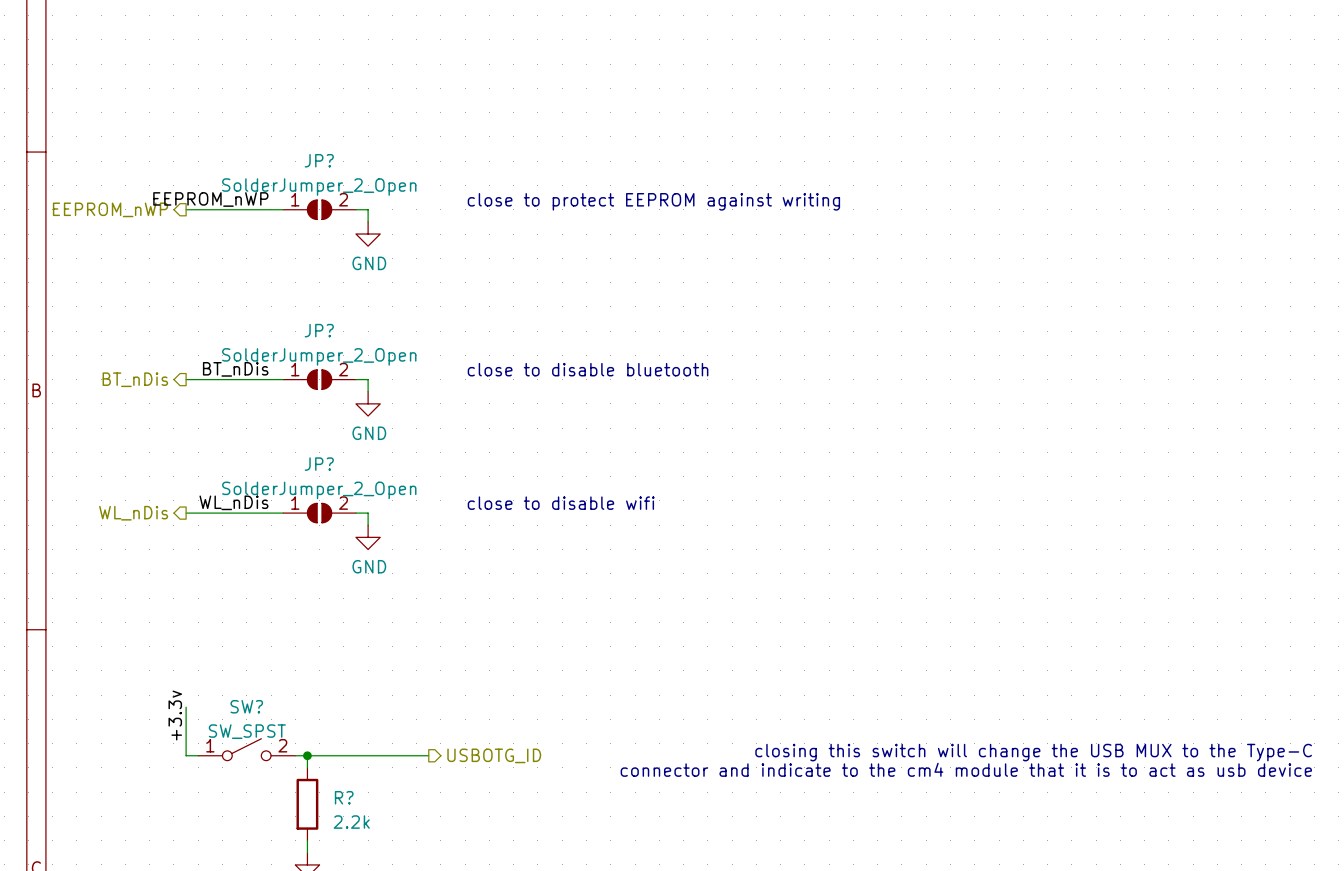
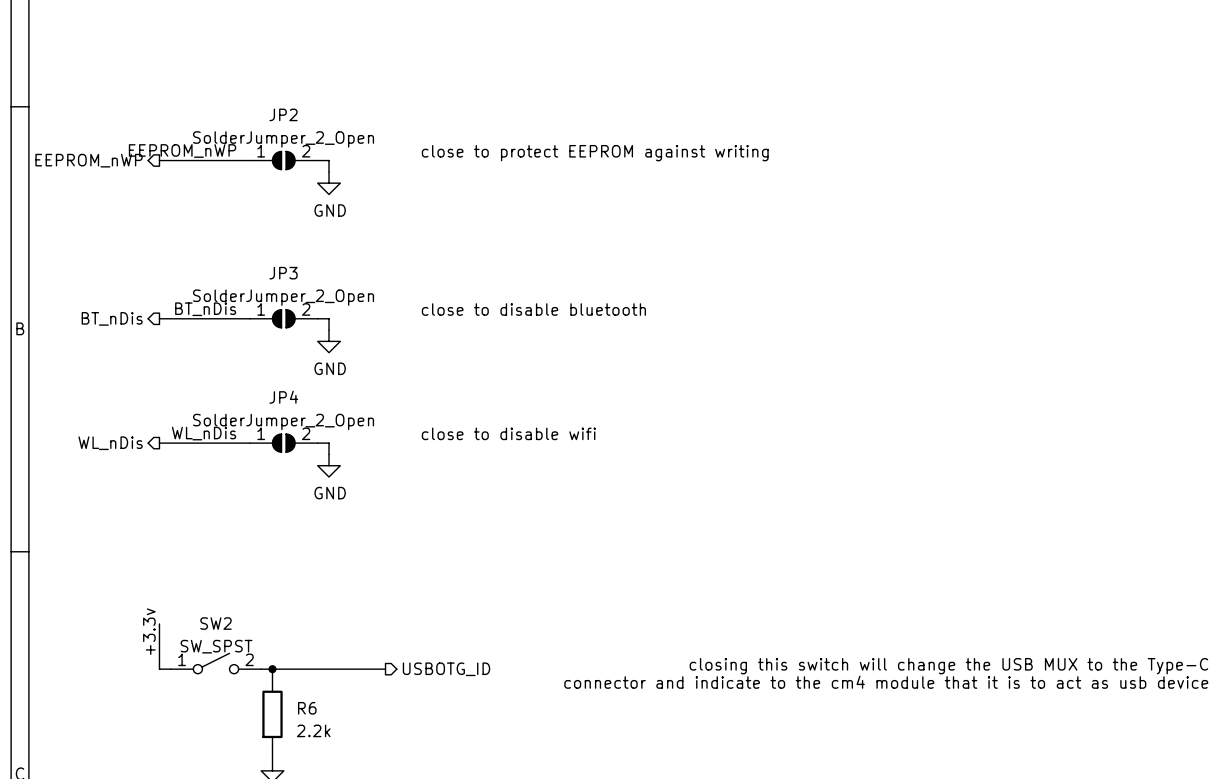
JP? name: JP? (319, 160) -> JP2 (283, 114)
JP? name: JP? (319, 330) -> JP3 (283, 273)
JP? name: JP? (319, 464) -> JP4 (283, 397)
SW? name: SW? (246, 706) -> SW2 (215, 623)
R? name: R? (344, 797) -> R6 (307, 708)

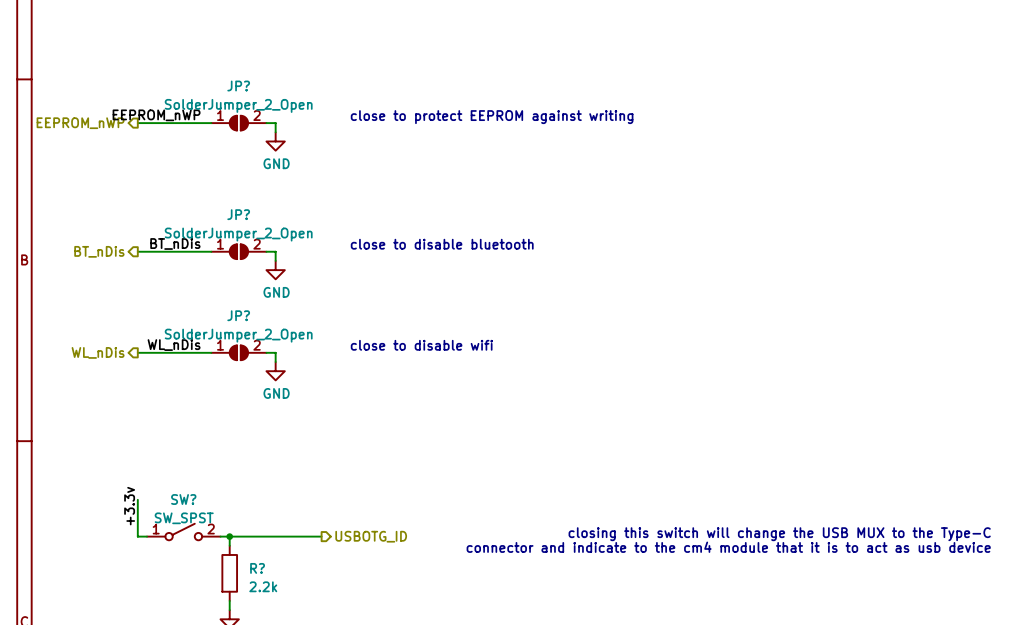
JP2 name: JP2 (283, 114) -> JP? (238, 86)
JP3 name: JP3 (283, 273) -> JP? (238, 214)
JP4 name: JP4 (283, 397) -> JP? (238, 315)
SW2 name: SW2 (215, 623) -> SW? (183, 499)
R6 name: R6 (307, 708) -> R? (257, 568)

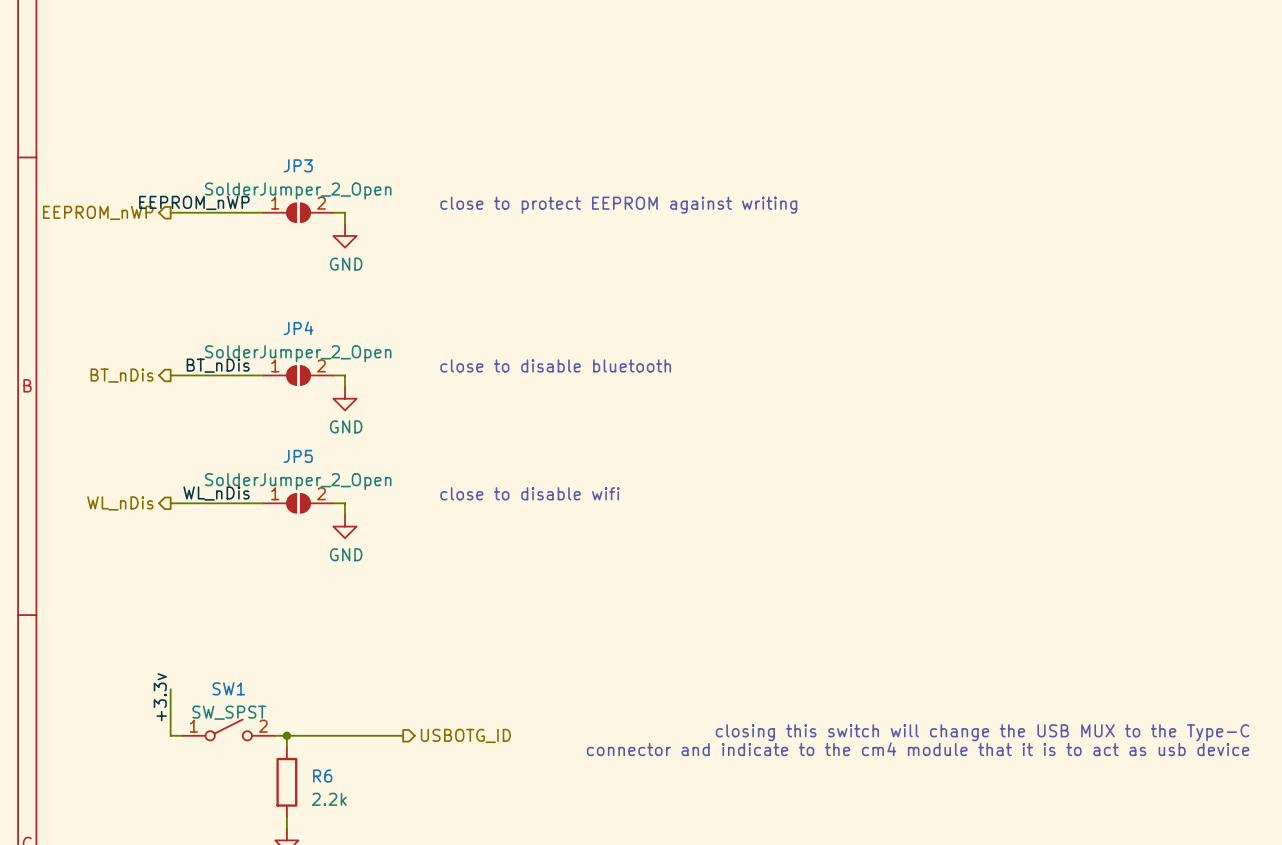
JP? name: JP? (238, 86) -> JP3 (298, 165)
JP? name: JP? (238, 214) -> JP4 (298, 328)
JP? name: JP? (238, 315) -> JP5 (298, 456)
SW? name: SW? (183, 499) -> SW1 (228, 688)
R? name: R? (257, 568) -> R6 (322, 776)

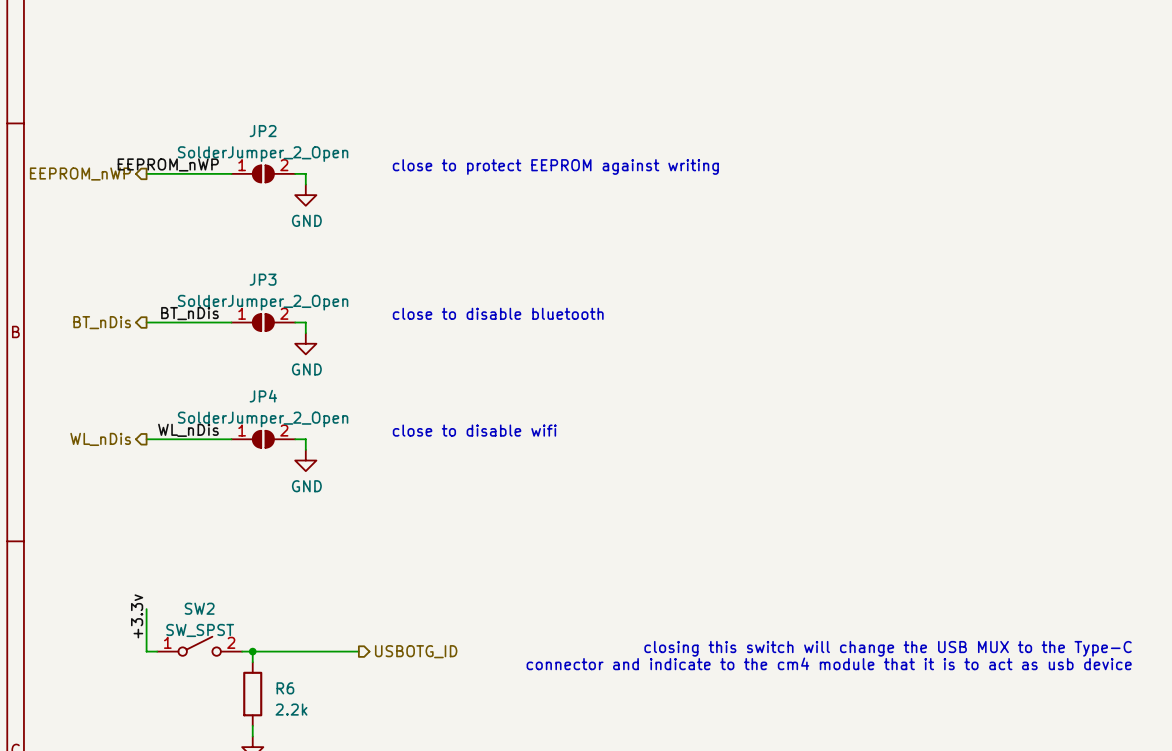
JP3 name: JP3 (298, 165) -> JP2 (263, 131)
JP4 name: JP4 (298, 328) -> JP3 (263, 279)
JP5 name: JP5 (298, 456) -> JP4 (263, 396)
SW1 name: SW1 (228, 688) -> SW2 (199, 608)

